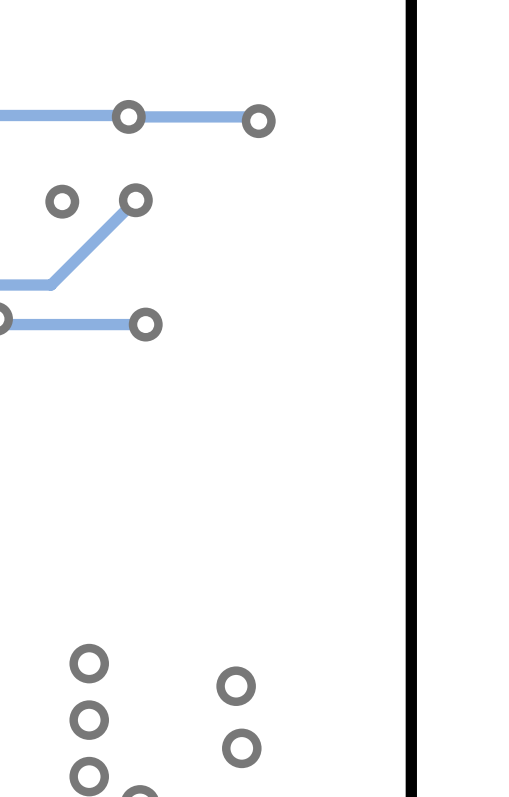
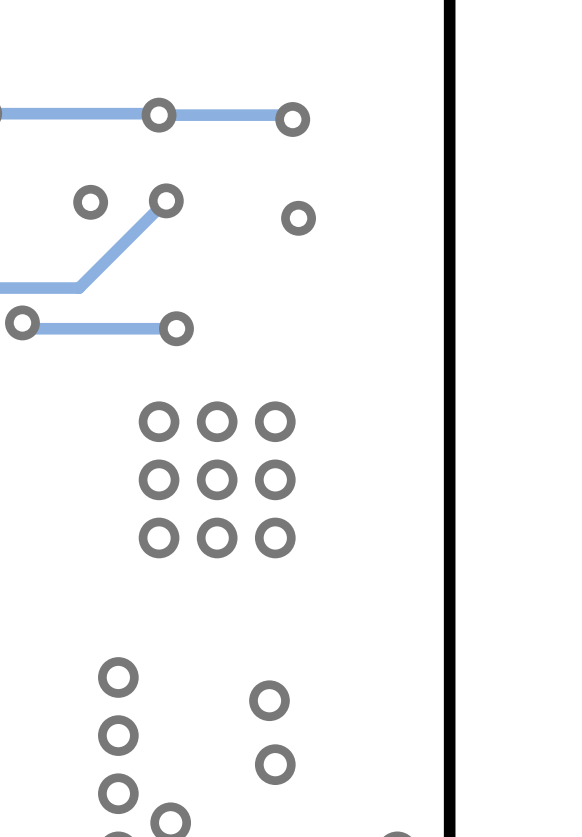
via: none -> (298, 218)
via: none -> (159, 421)
via: none -> (217, 421)
via: none -> (275, 421)
via: none -> (159, 479)
via: none -> (217, 479)
via: none -> (275, 479)
via: none -> (159, 537)
via: none -> (217, 537)
via: none -> (275, 537)

